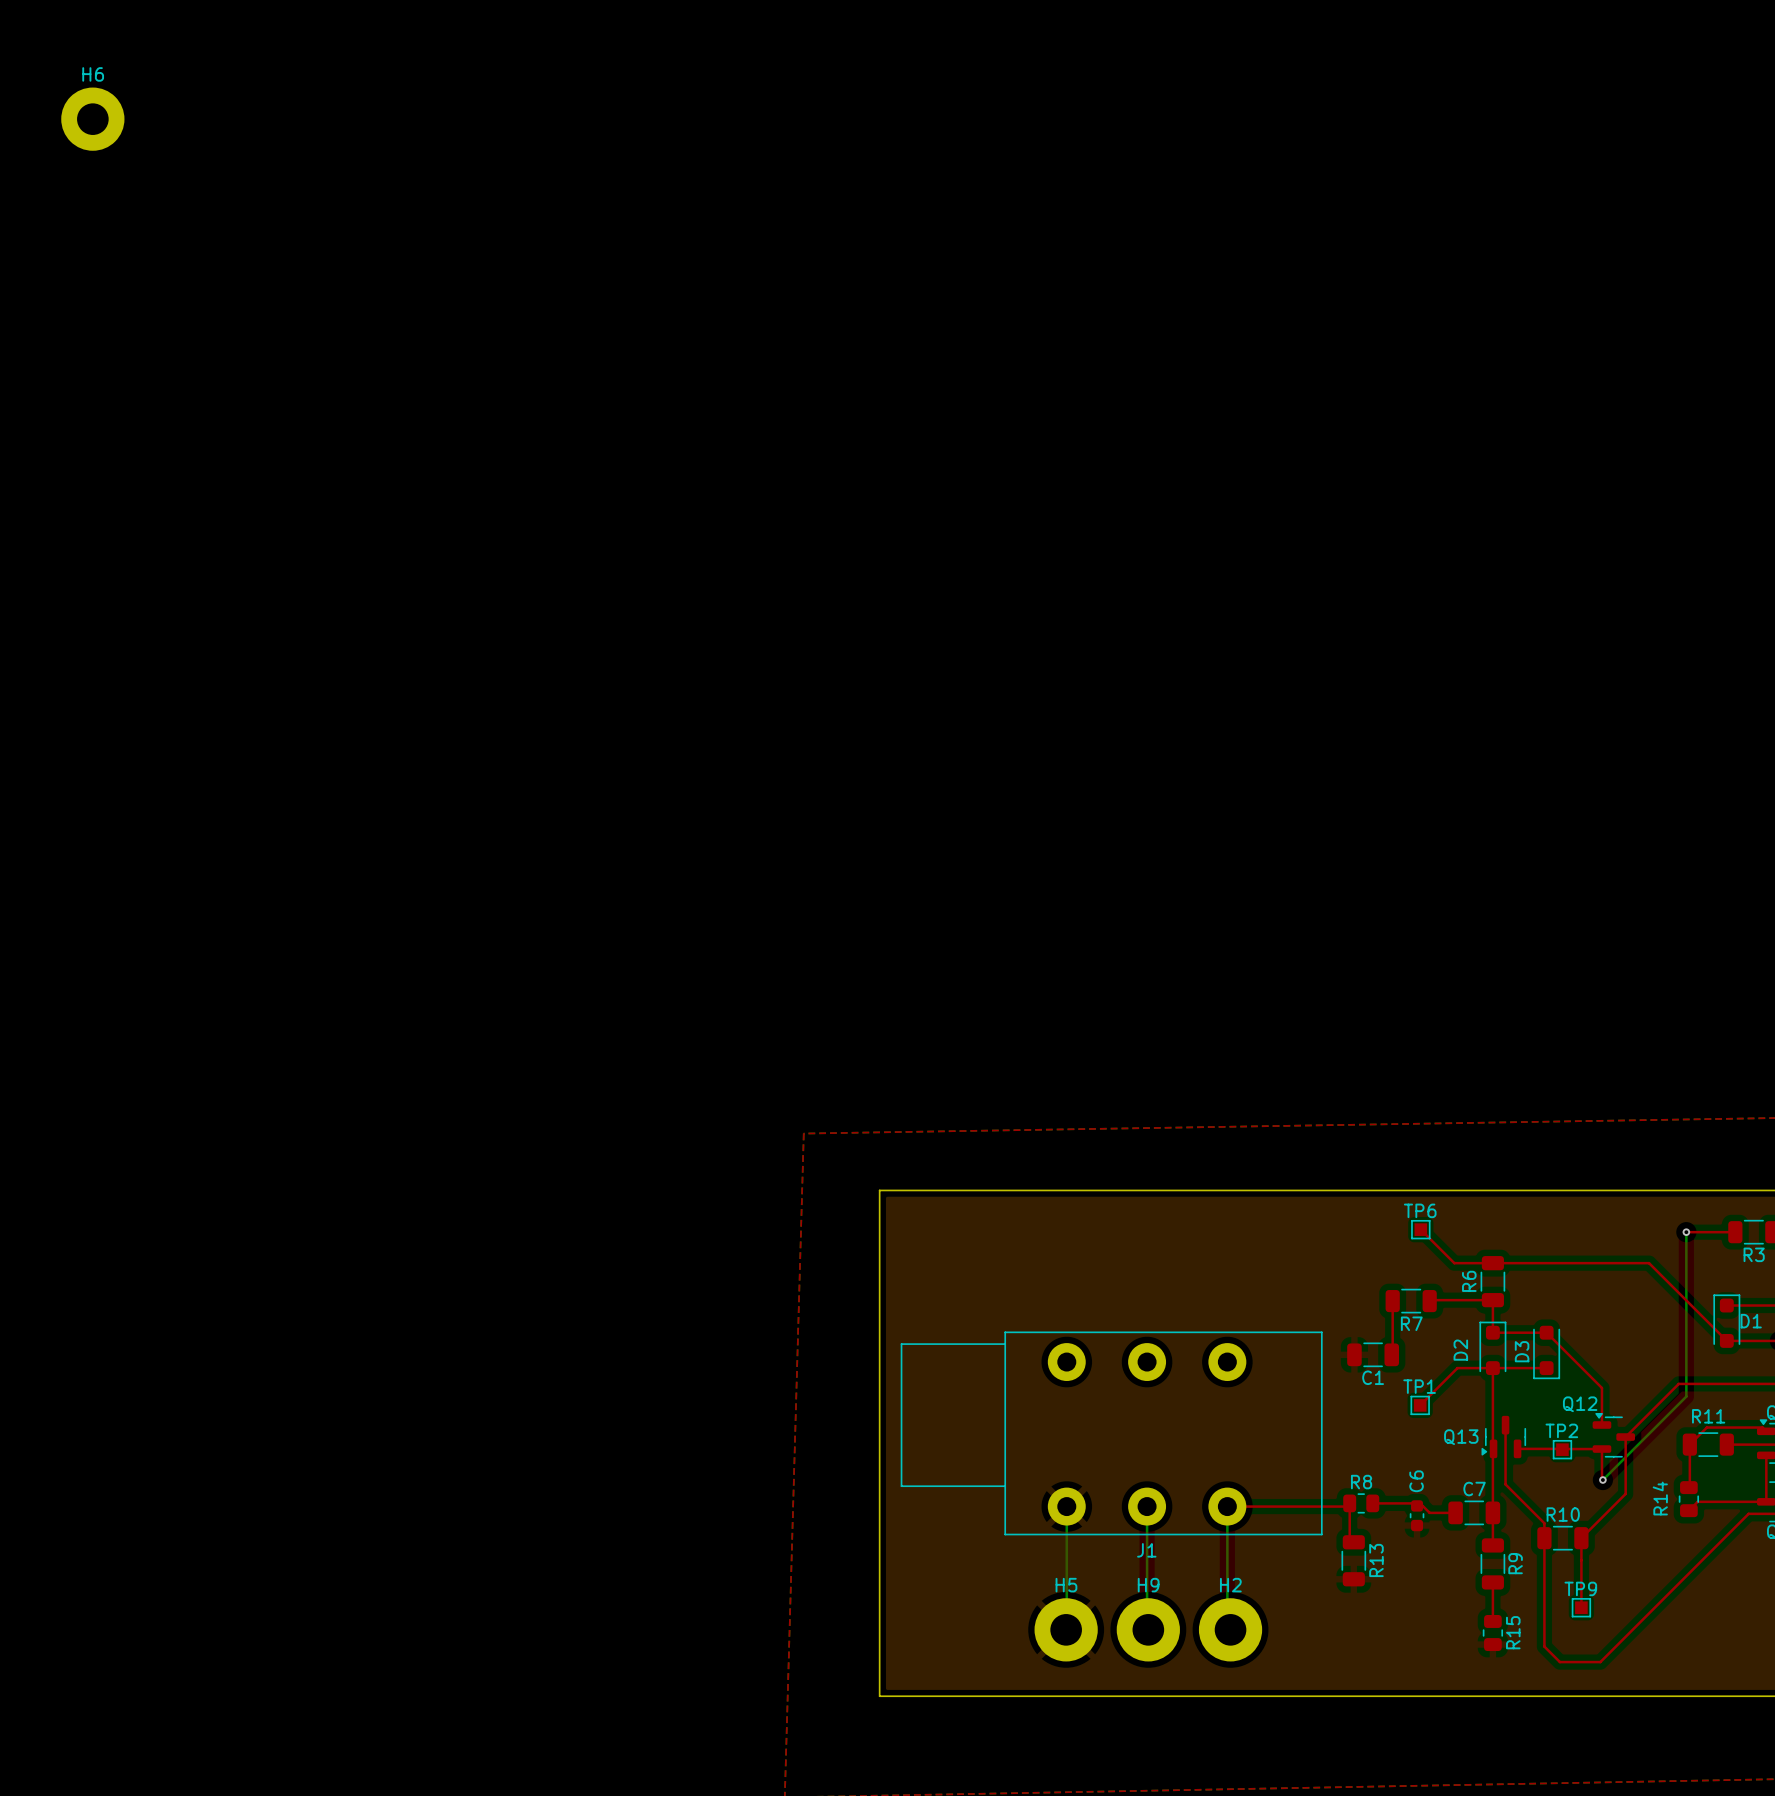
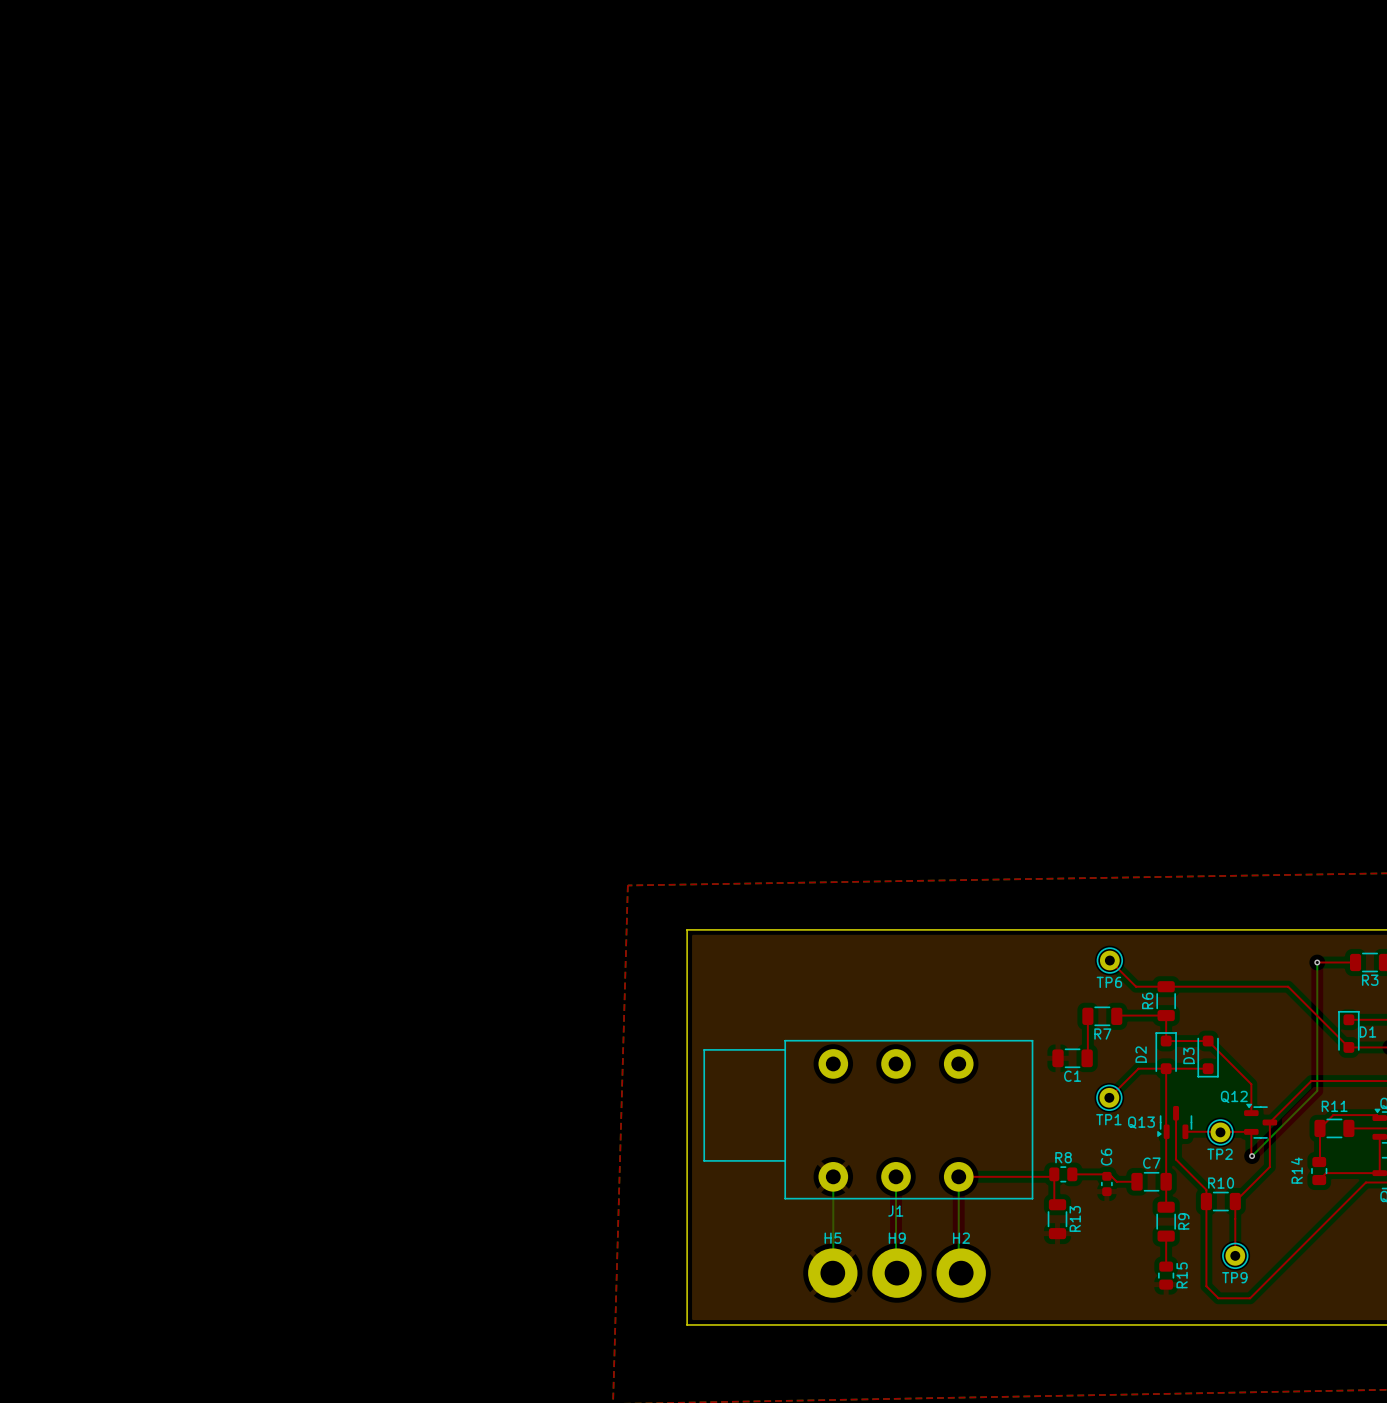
H6: (92, 119) -> none
TP6 name position: TP6 (1420, 1210) -> TP6 (1109, 982)
TP6 footprint: [1411, 1220, 1431, 1240] -> [1096, 947, 1123, 974]
TP1 name position: TP1 (1419, 1386) -> TP1 (1108, 1119)
TP1 footprint: [1410, 1395, 1430, 1416] -> [1096, 1084, 1123, 1111]
TP2 name position: TP2 (1561, 1430) -> TP2 (1220, 1154)
TP2 footprint: [1552, 1440, 1573, 1460] -> [1207, 1119, 1234, 1146]
TP9 name position: TP9 (1580, 1588) -> TP9 (1234, 1277)
TP9 footprint: [1571, 1598, 1592, 1618] -> [1222, 1242, 1249, 1269]

